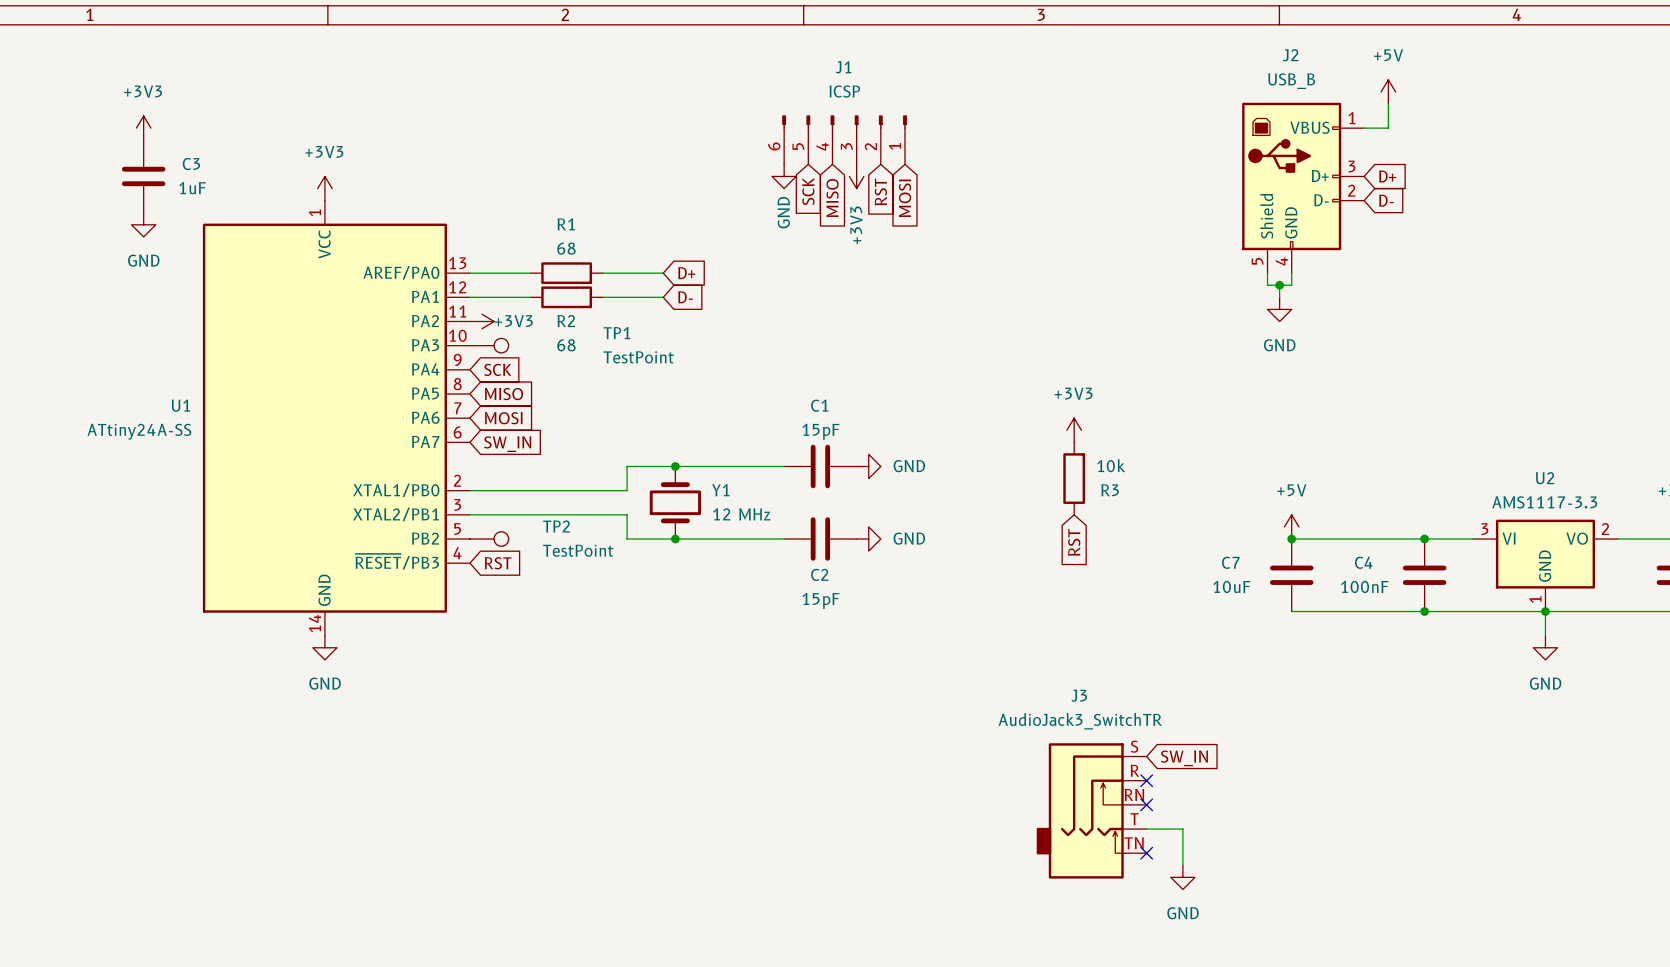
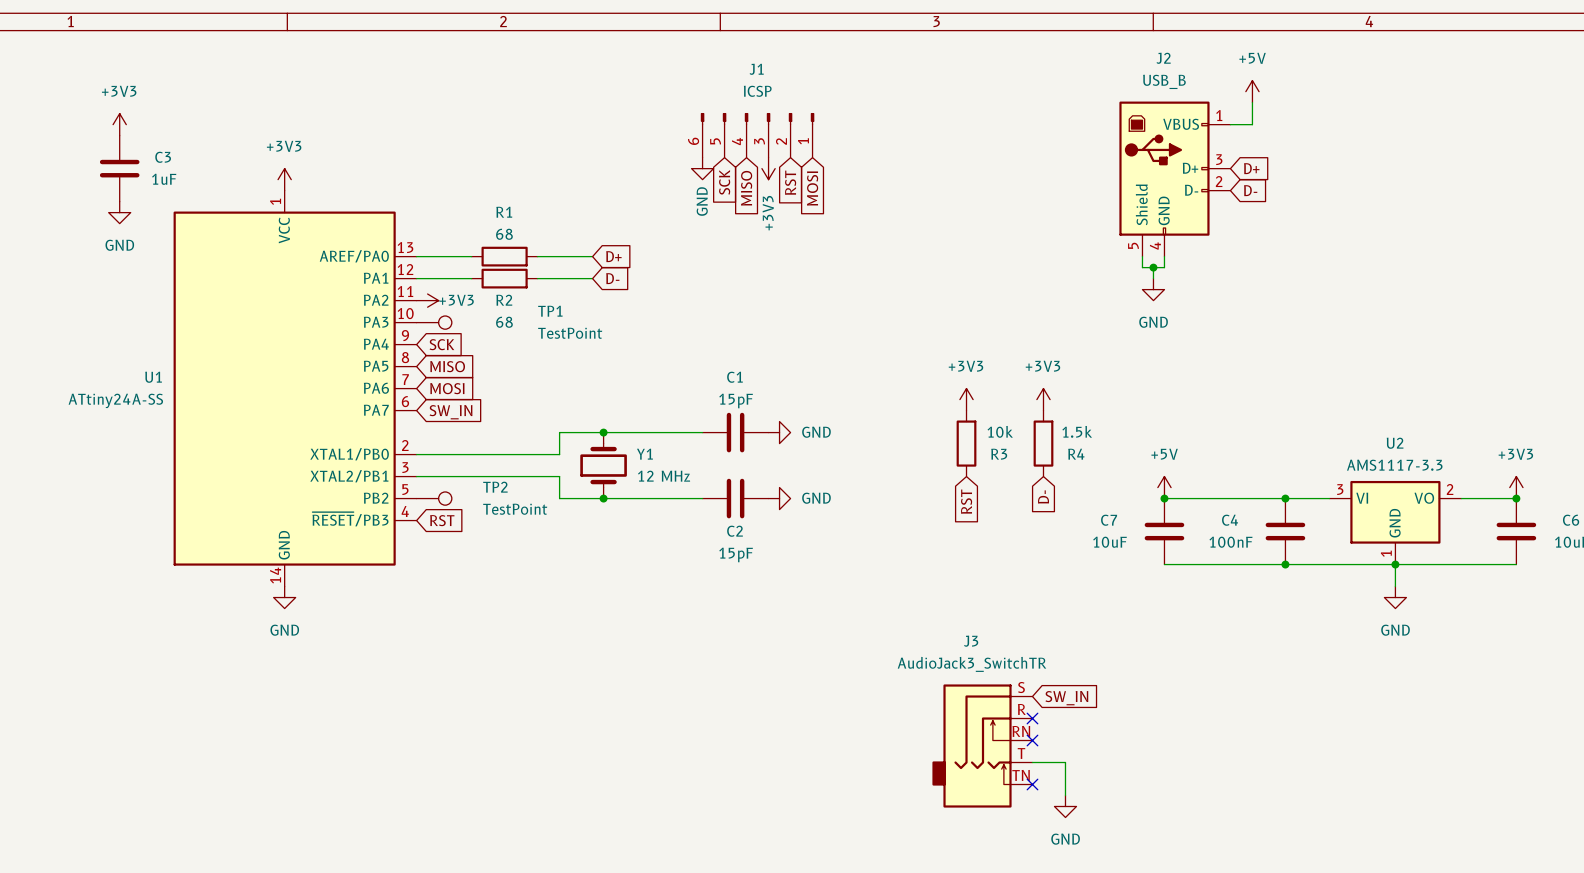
power symbol: none -> +3V3 (1043, 399)
R4: none -> 1.5k (1043, 443)
global label: none -> D- (1043, 497)

